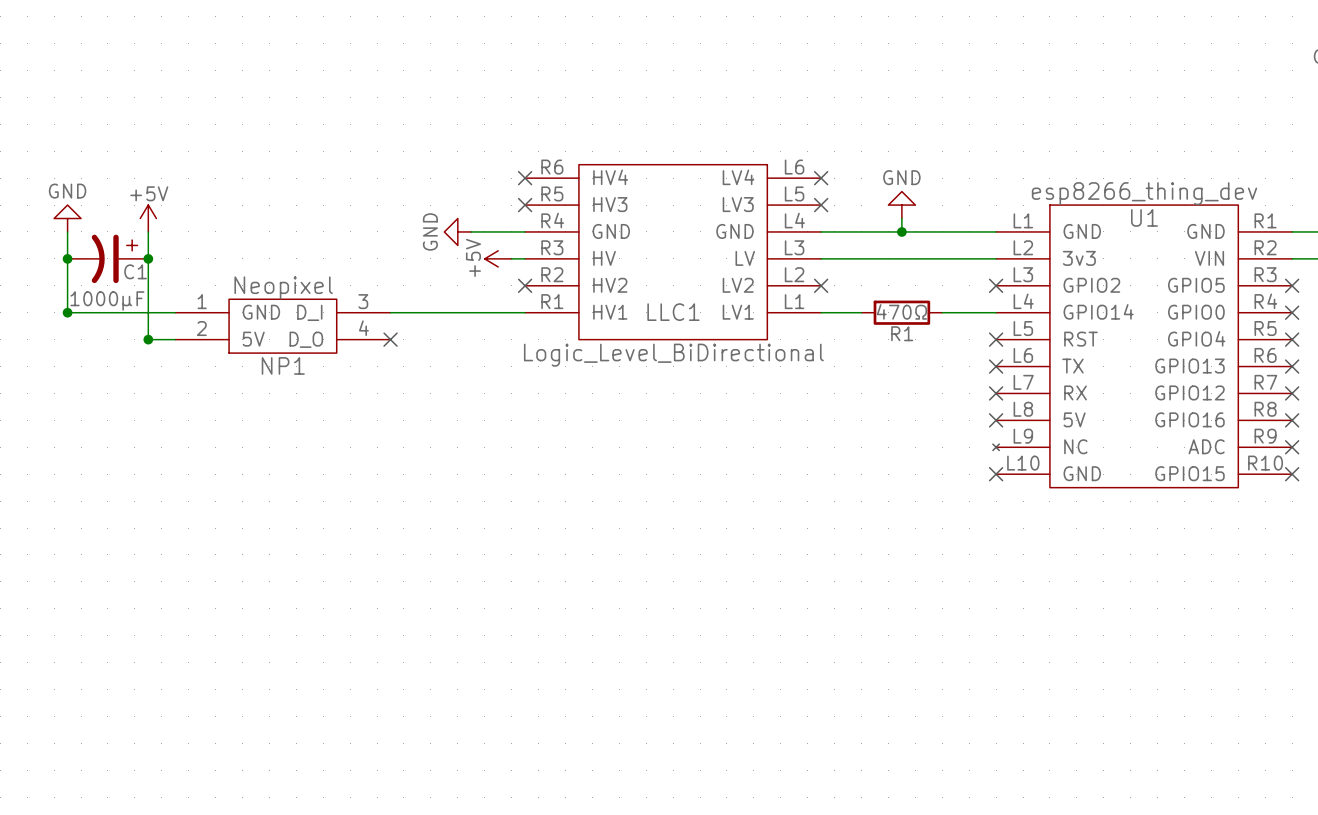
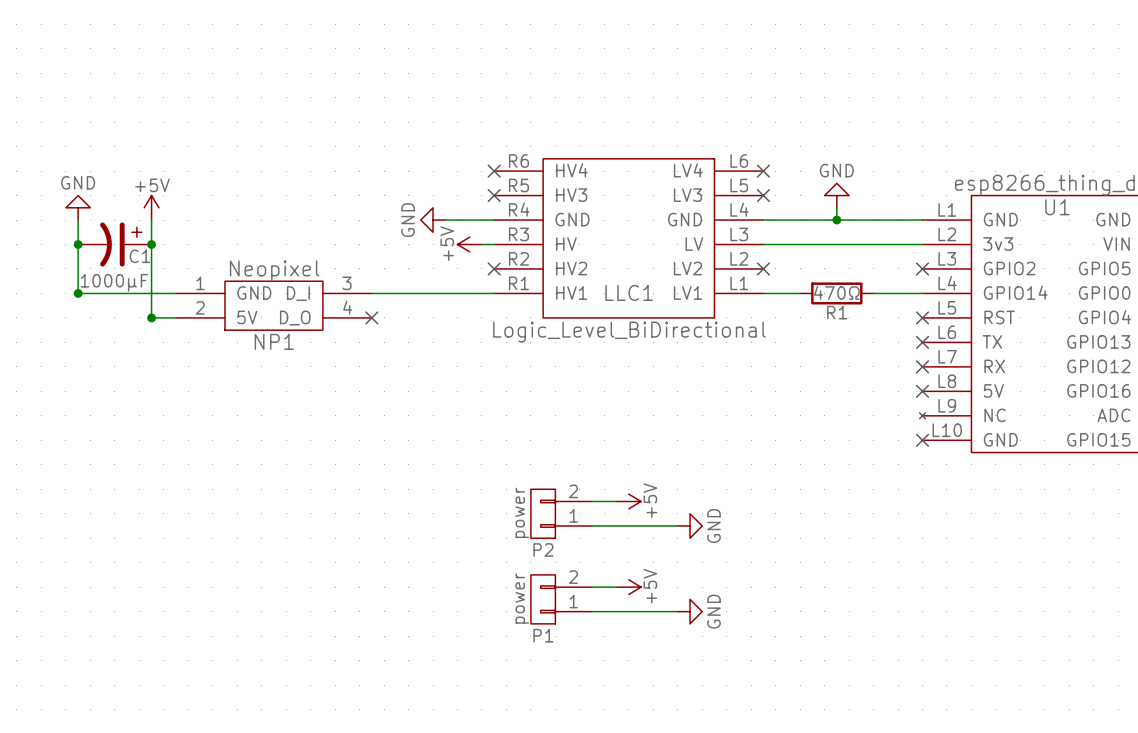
wire: none -> (592, 501) (616, 501)
power symbol: none -> +5V (628, 501)
P2: none -> power (561, 513)
wire: none -> (592, 525) (677, 525)
power symbol: none -> GND (689, 525)
wire: none -> (592, 587) (616, 587)
power symbol: none -> +5V (628, 587)
P1: none -> power (561, 599)
wire: none -> (592, 611) (677, 611)
power symbol: none -> GND (689, 611)

